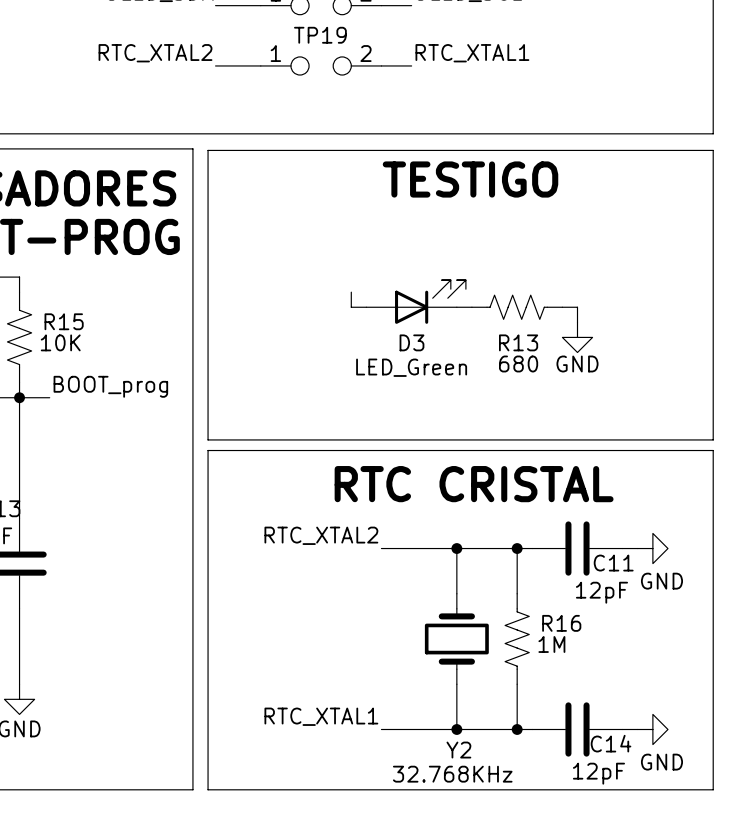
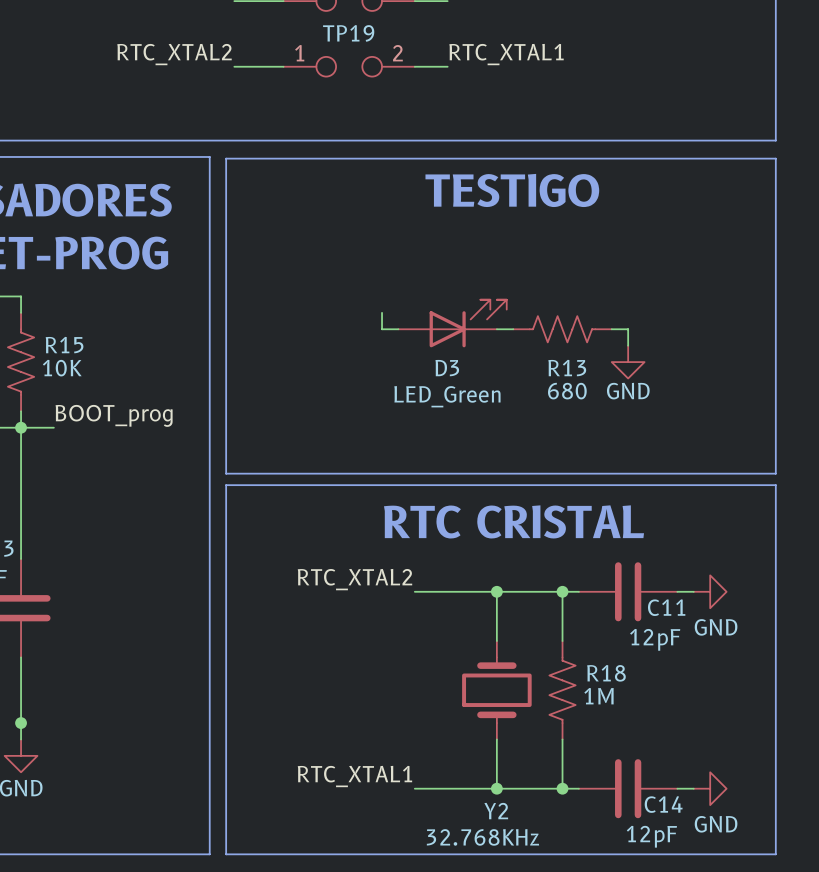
R16 name: R16 (561, 623) -> R18 (606, 673)
junction: none -> (21, 723)

